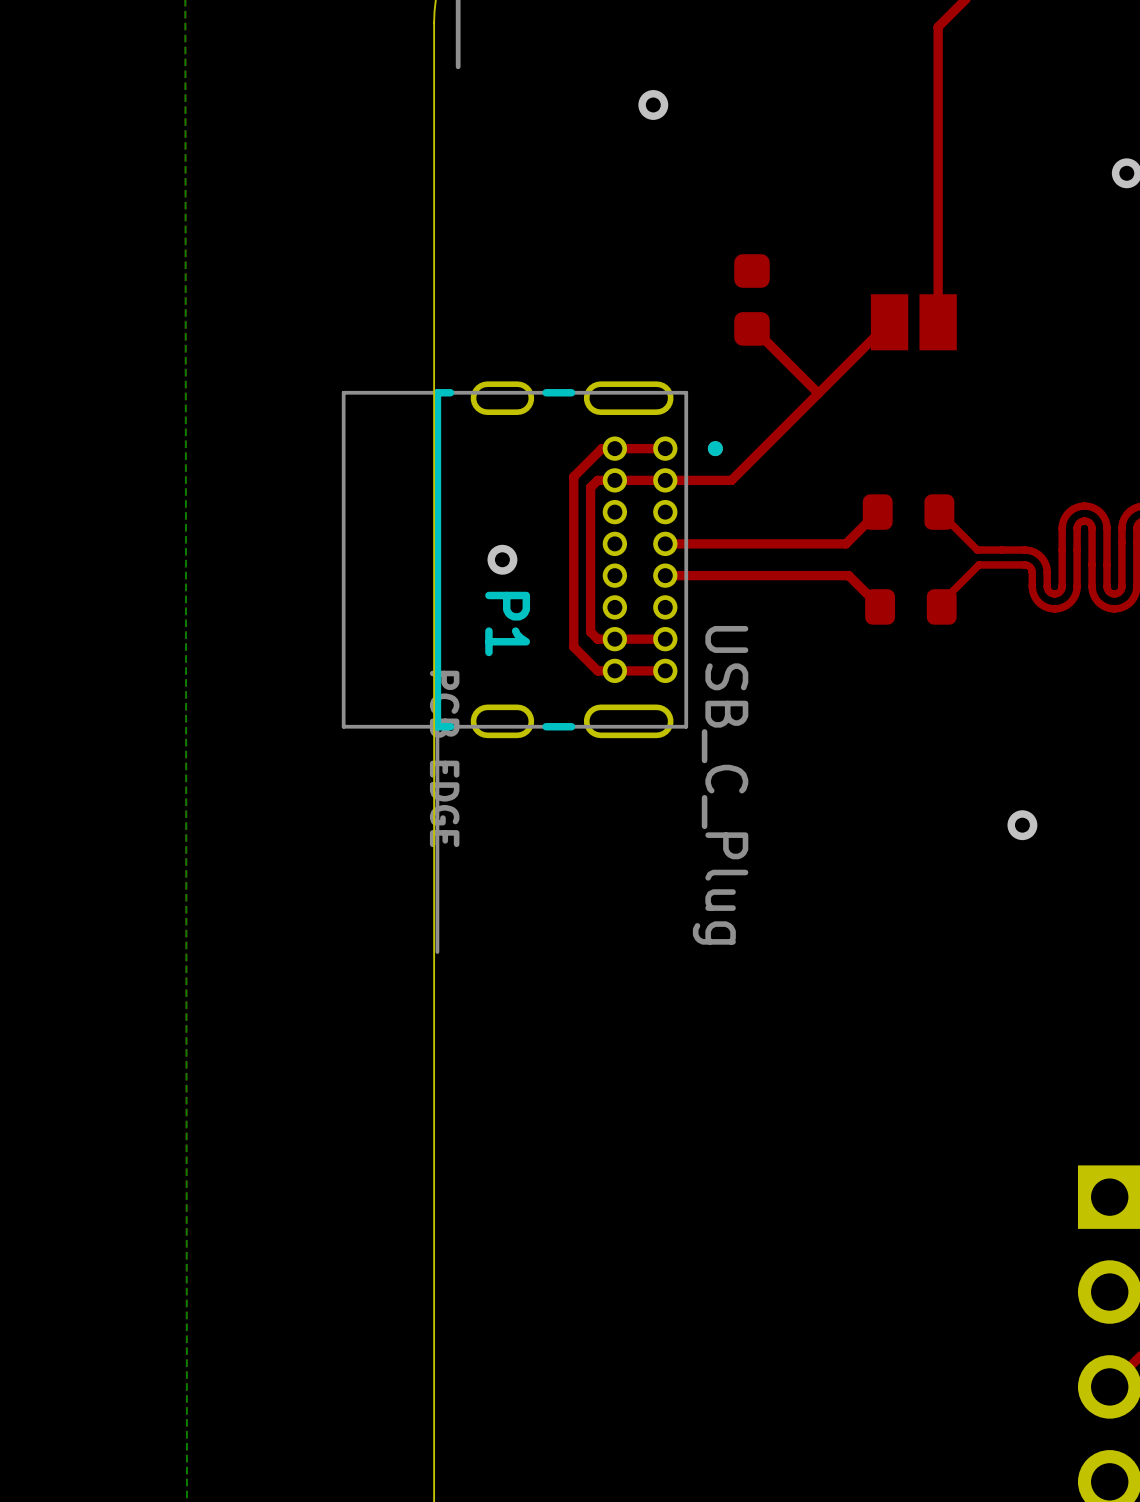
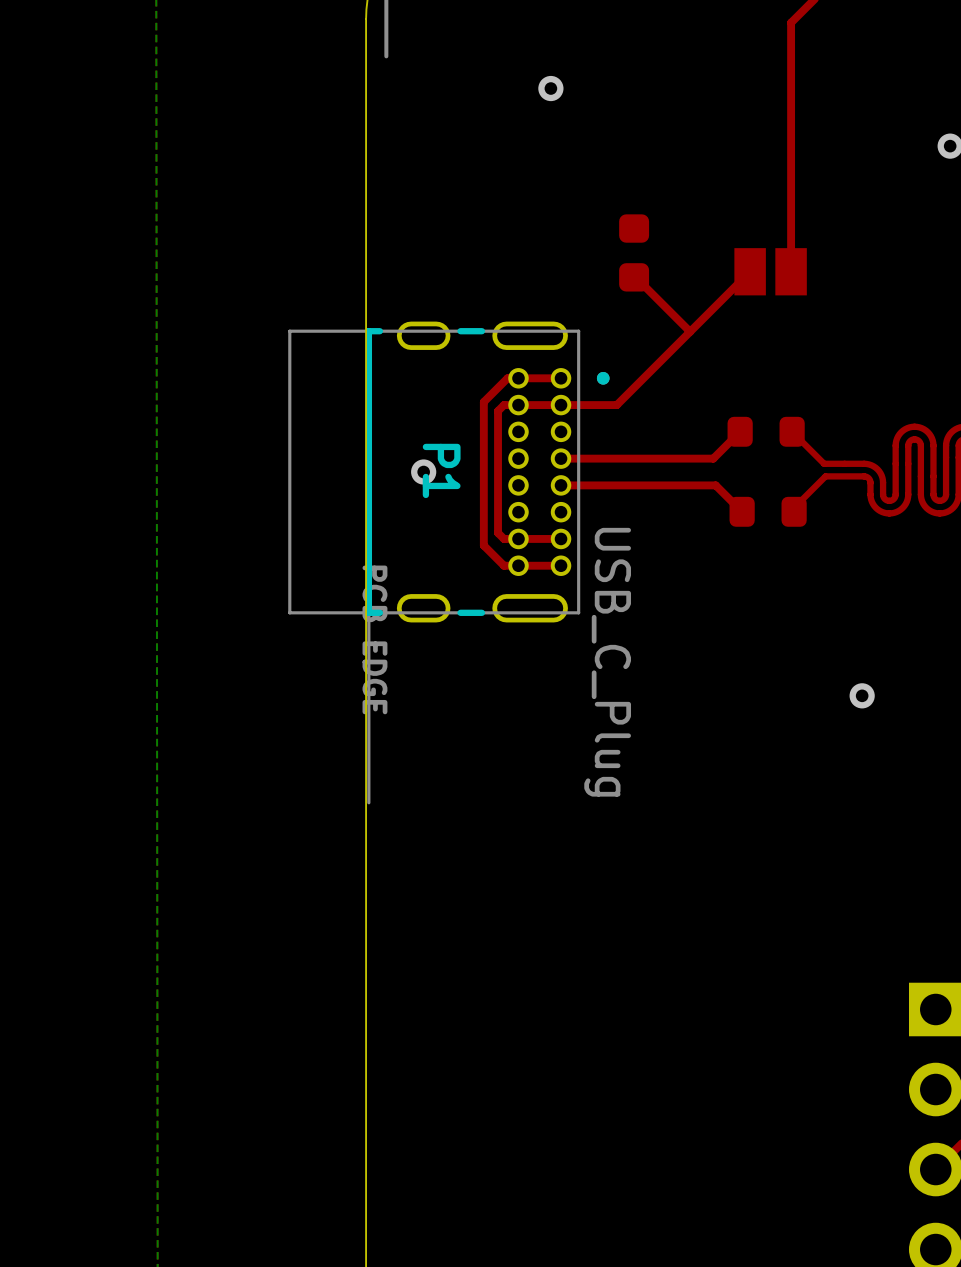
P1 name position: P1 (507, 623) -> P1 (441, 470)

